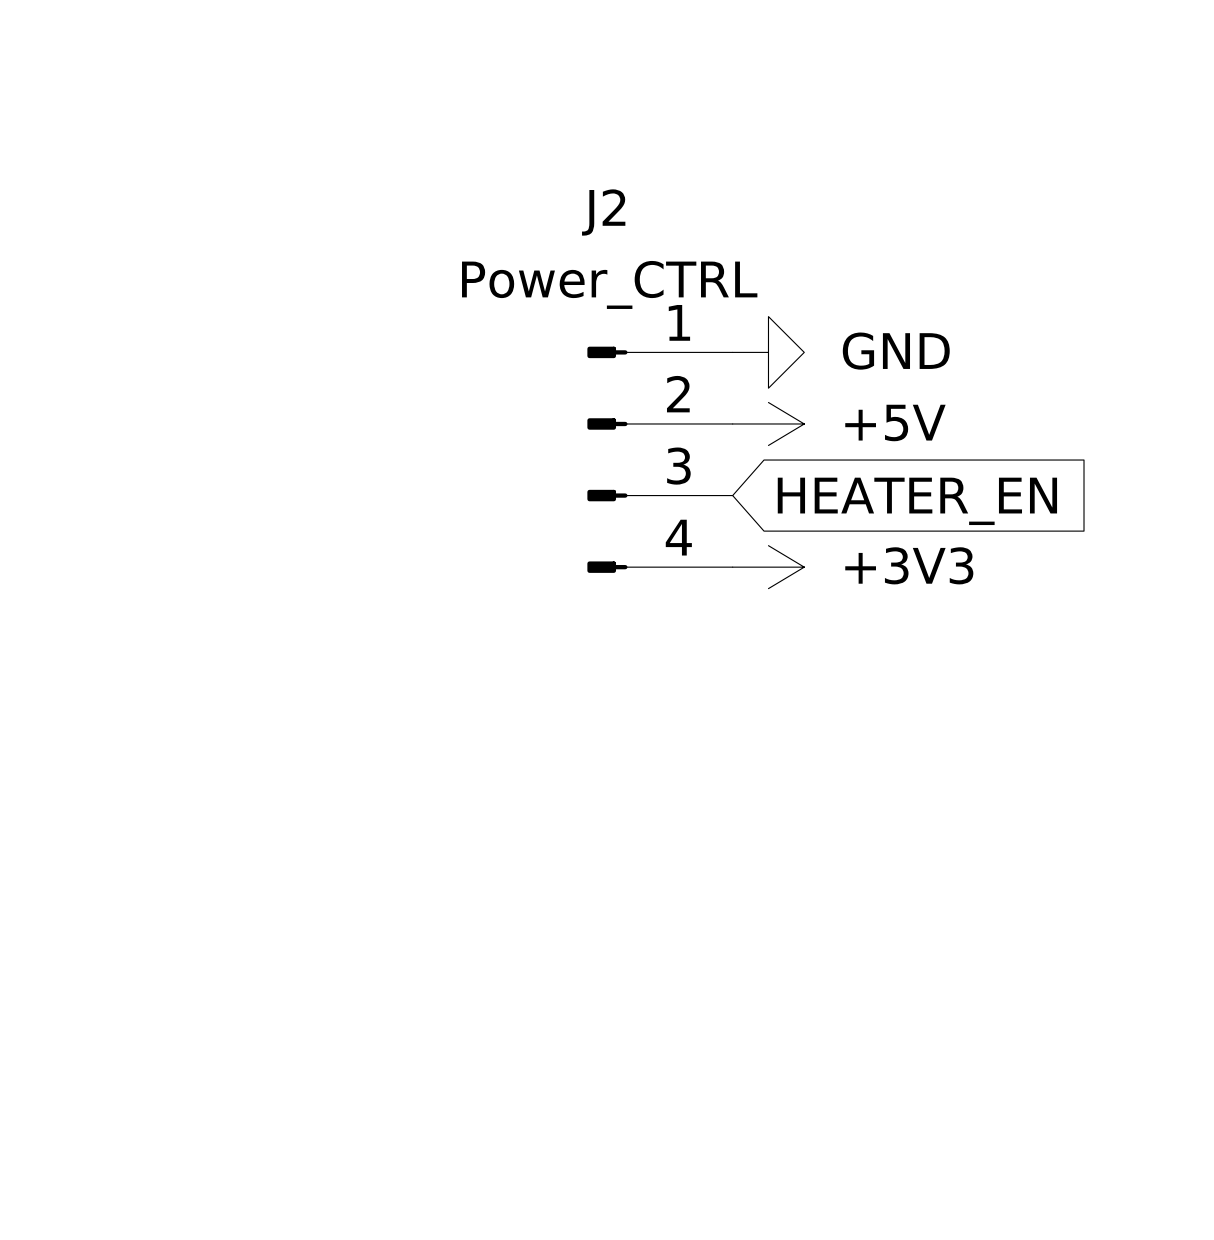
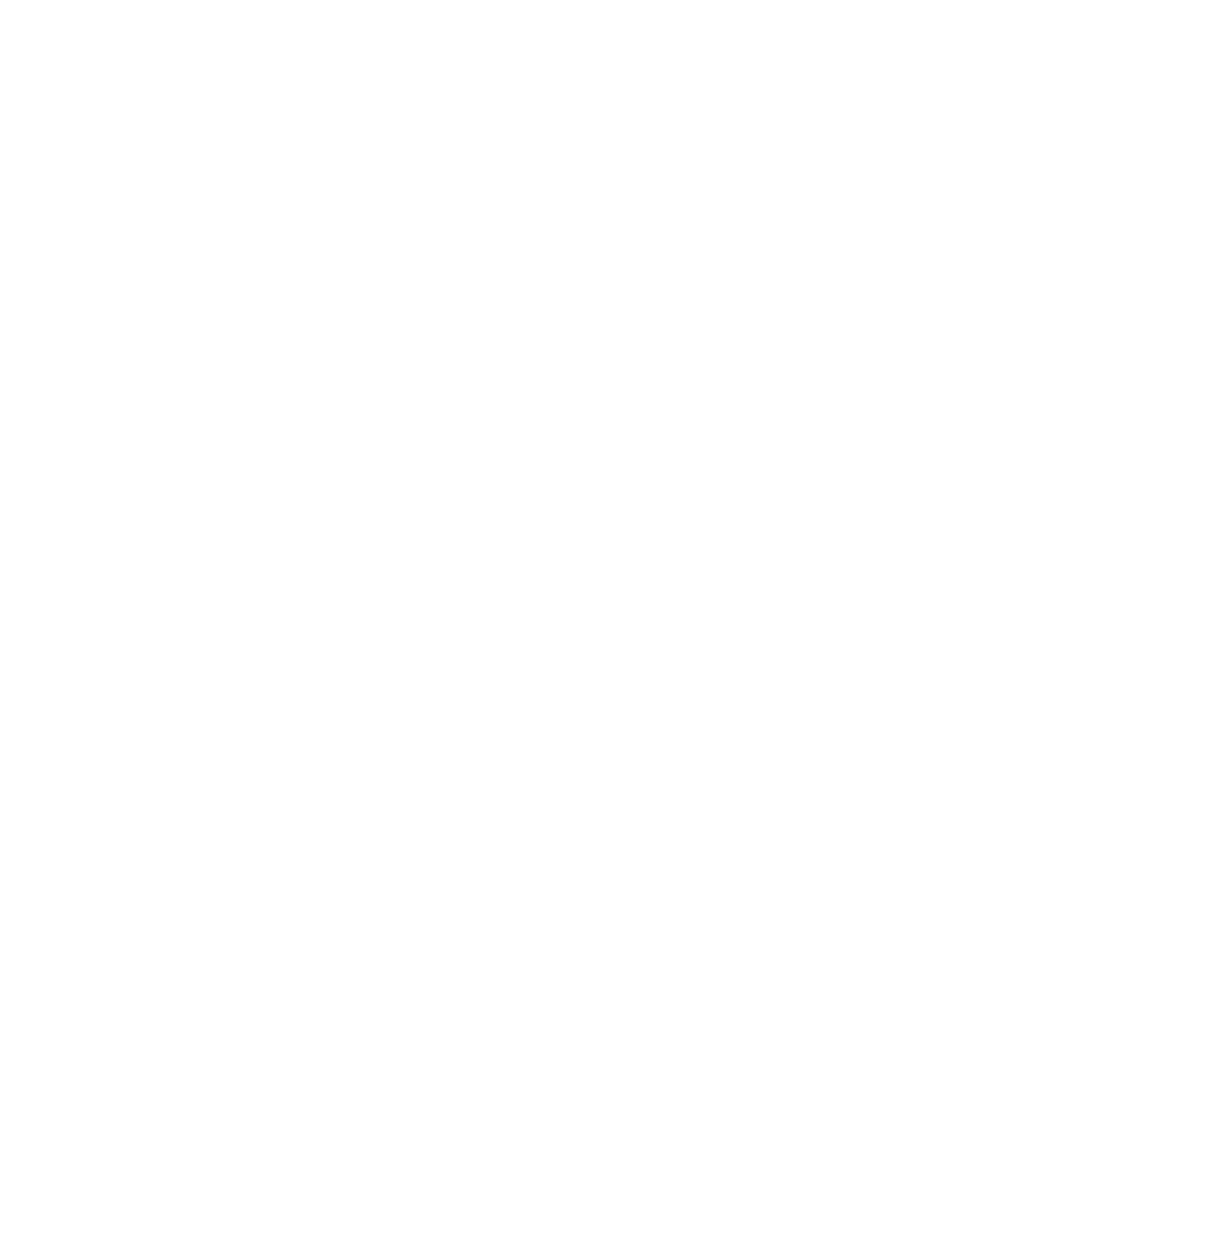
power symbol: GND (768, 352) -> none
power symbol: +5V (768, 423) -> none
J2: Power_CTRL (660, 459) -> none
global label: HEATER_EN (917, 501) -> none
power symbol: +3V3 (768, 567) -> none

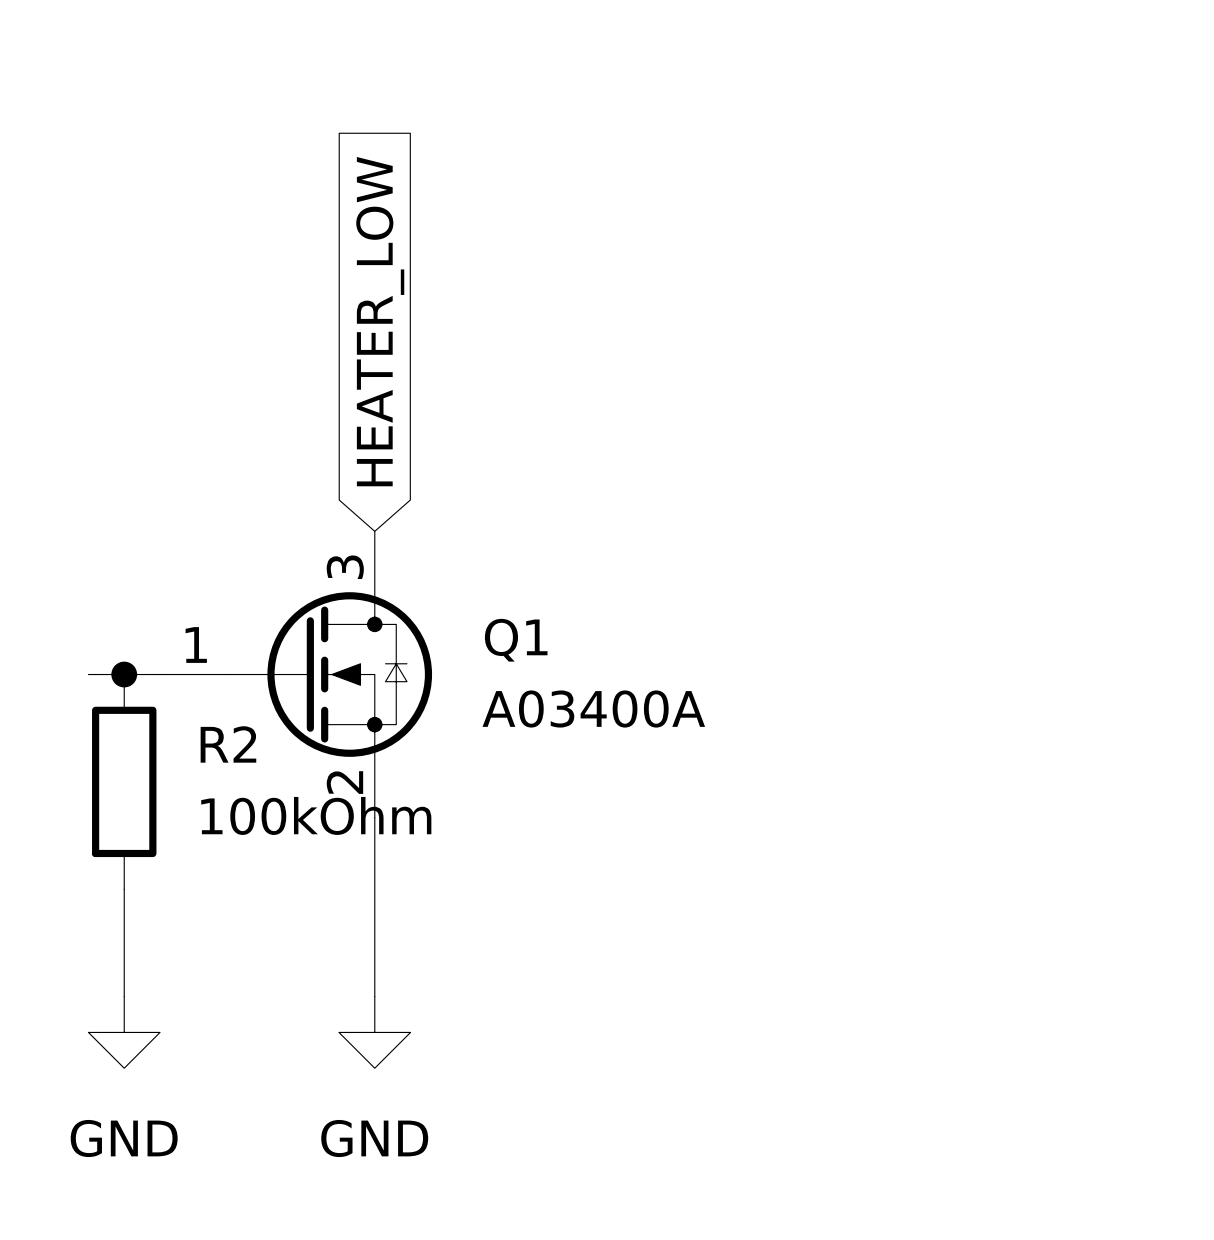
global label: none -> HEATER_LOW (380, 321)
wire: none -> (88, 674) (160, 674)
junction: none -> (124, 674)
Q1: none -> A03400A (296, 674)
R2: none -> 100kOhm (124, 781)
wire: none -> (374, 817) (374, 996)
wire: none -> (124, 889) (124, 996)
power symbol: none -> GND (124, 1032)
power symbol: none -> GND (374, 1032)

